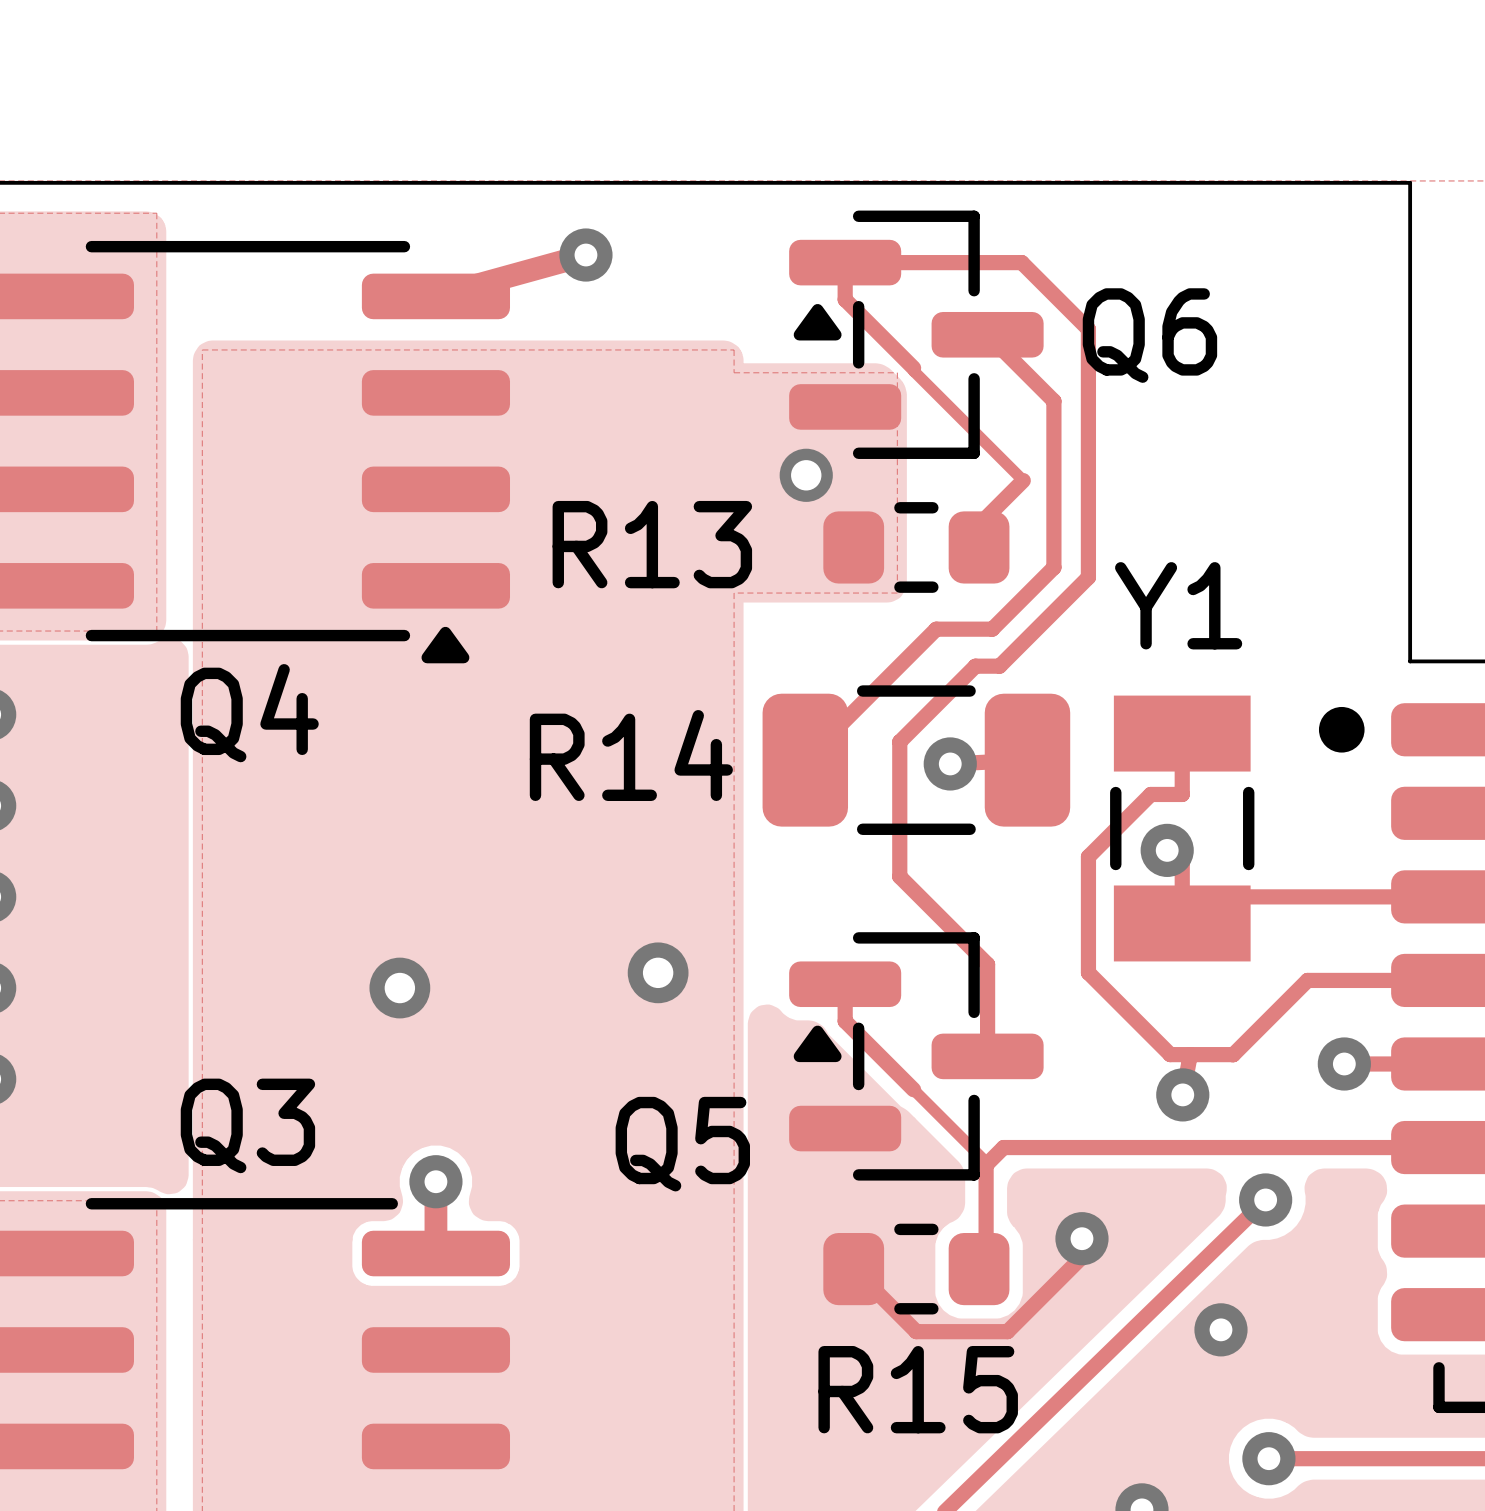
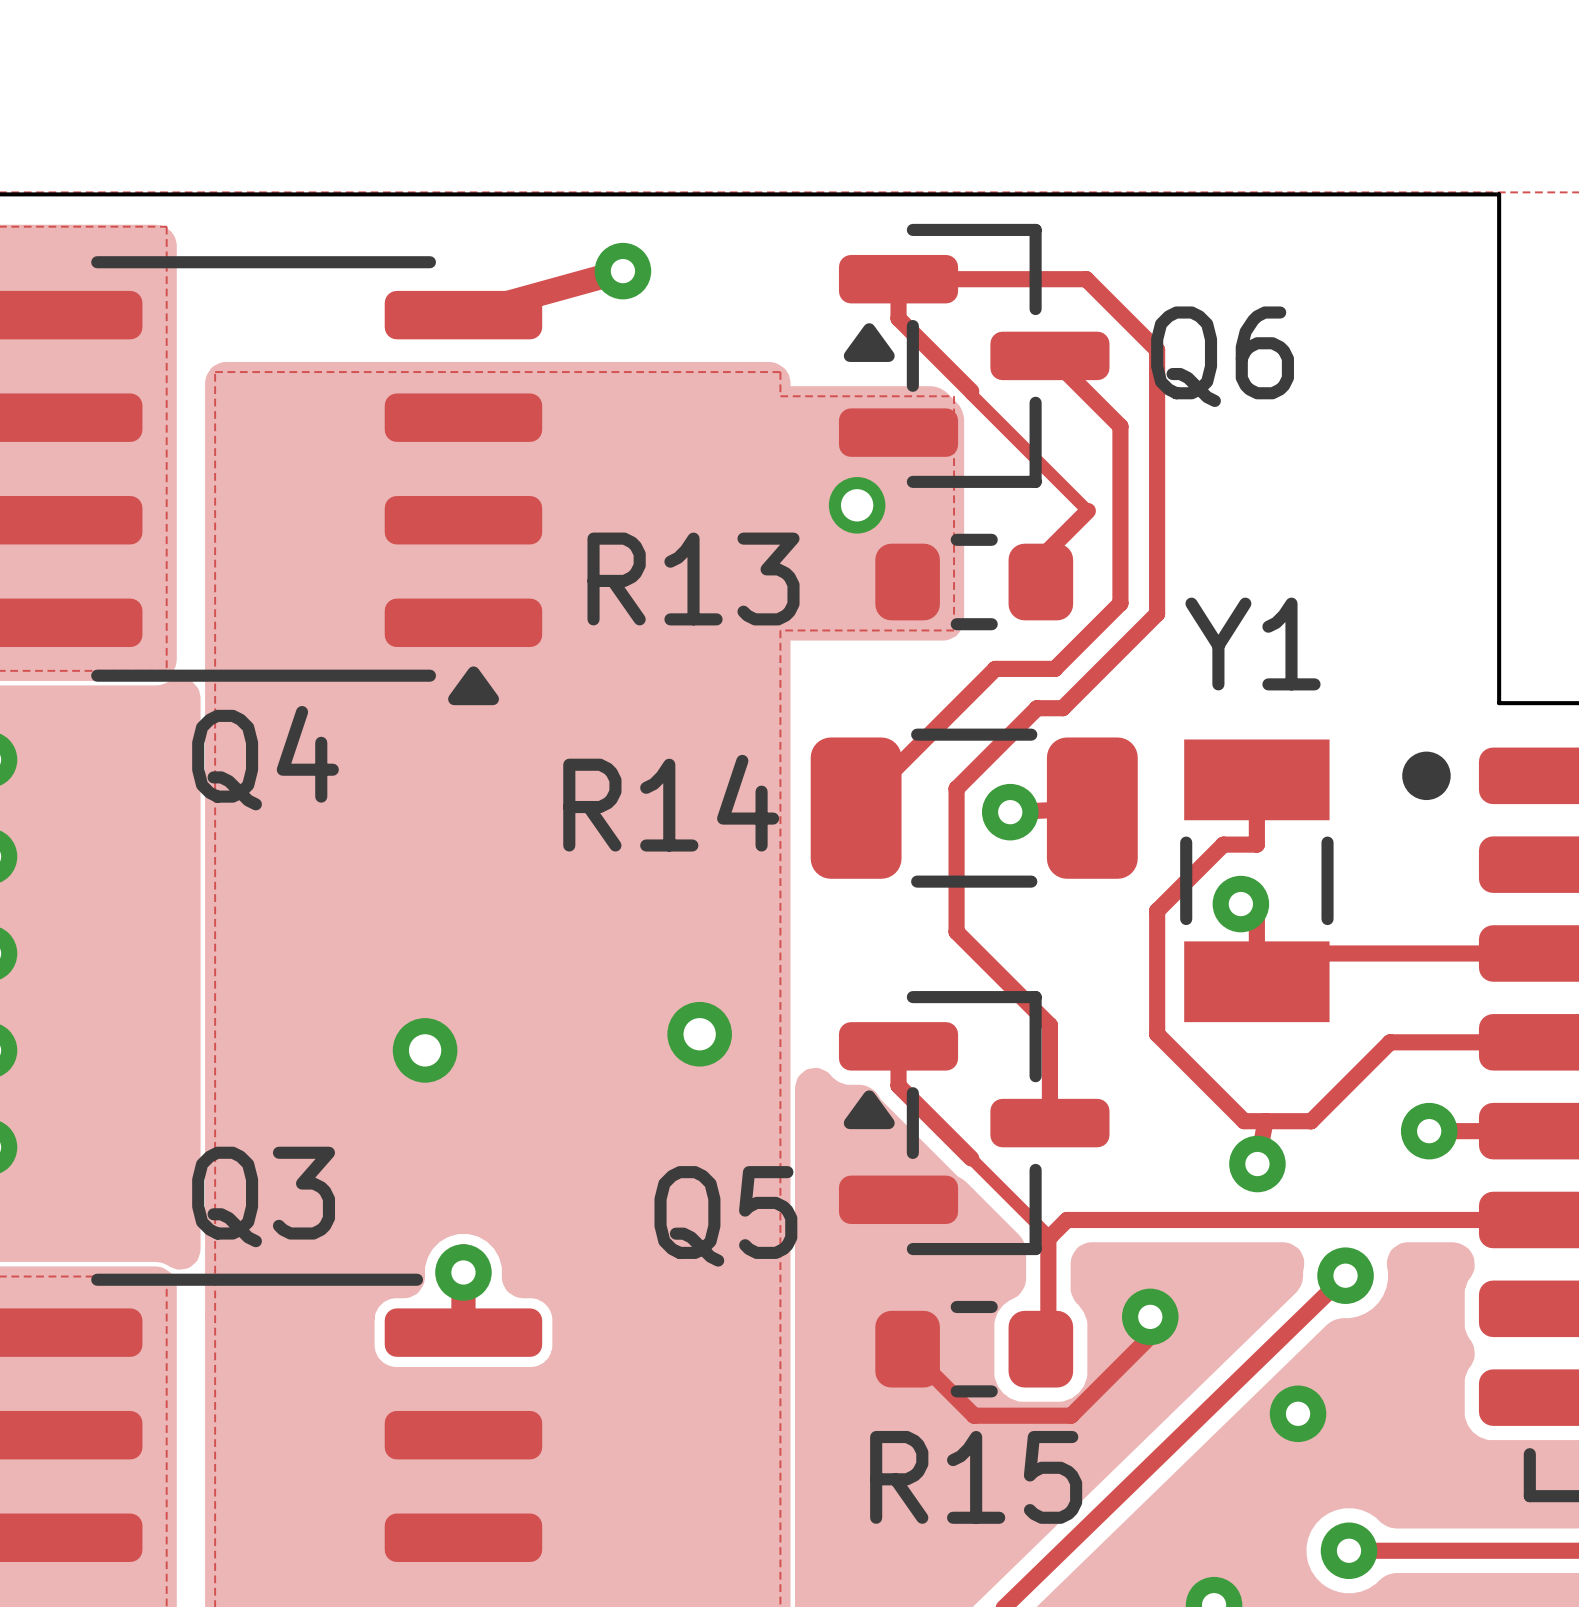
via position: (435, 1181) -> (463, 1272)

